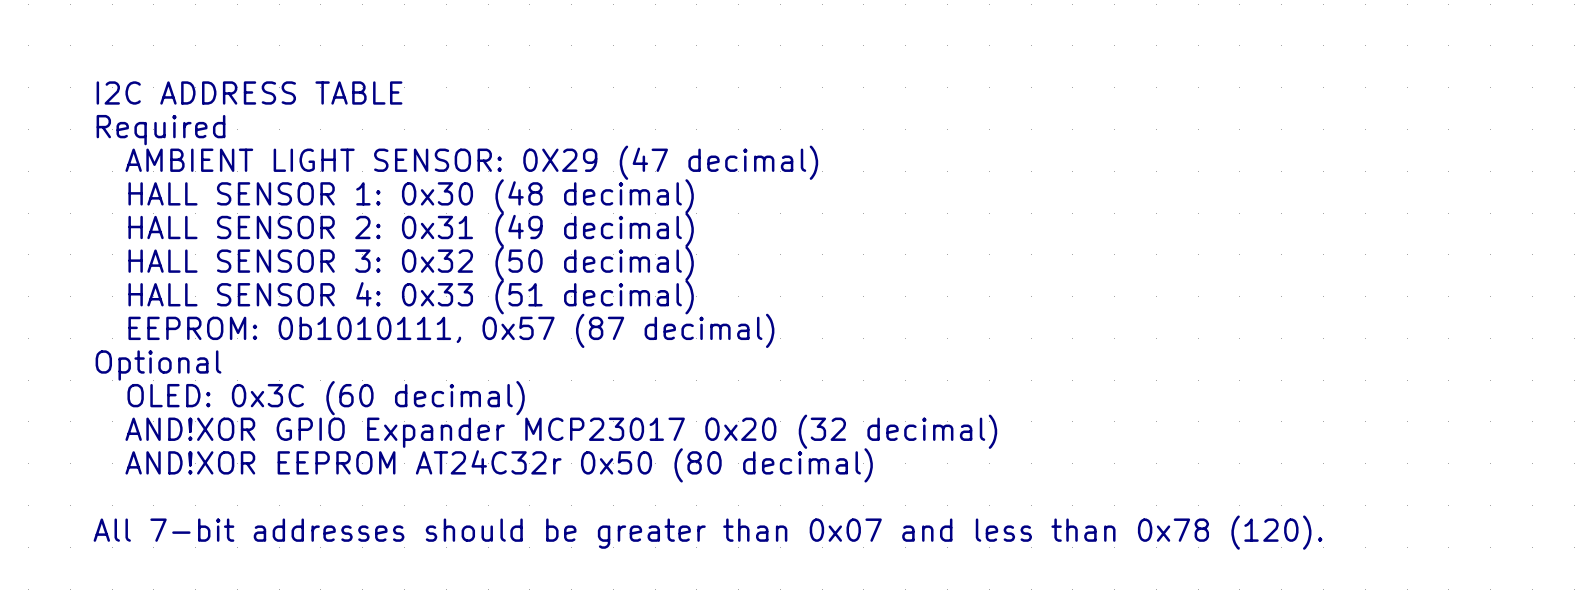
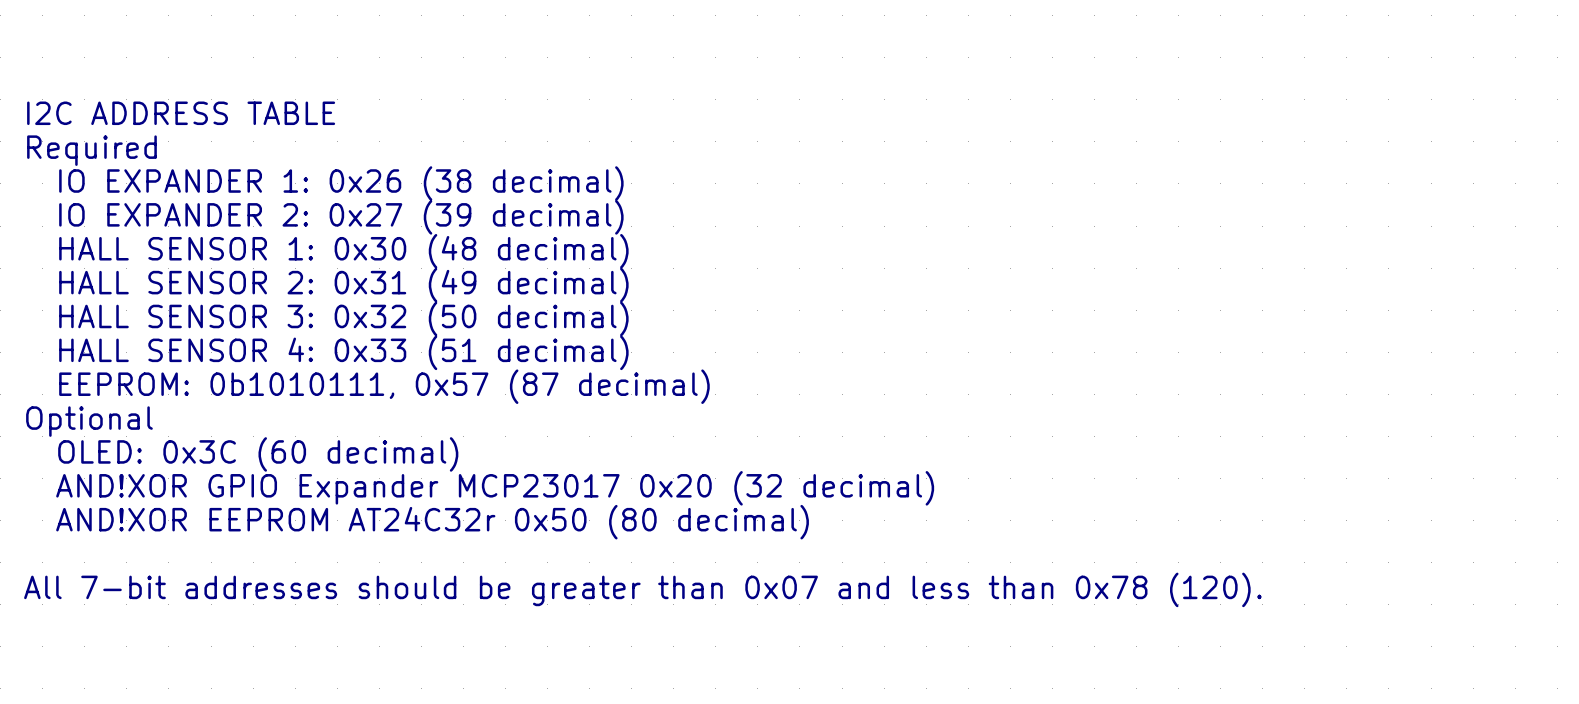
text: none -> I2C ADDRESS TABLE (181, 113)
text: I2C ADDRESS TABLE (249, 92) -> Required (91, 150)
text: Required (160, 130) -> IO EXPANDER 1: 0x26 (38 decimal) (341, 183)
text: AMBIENT LIGHT SENSOR: 0X29 (47 decimal) (471, 162) -> IO EXPANDER 2: 0x27 (39 decimal) (341, 217)

